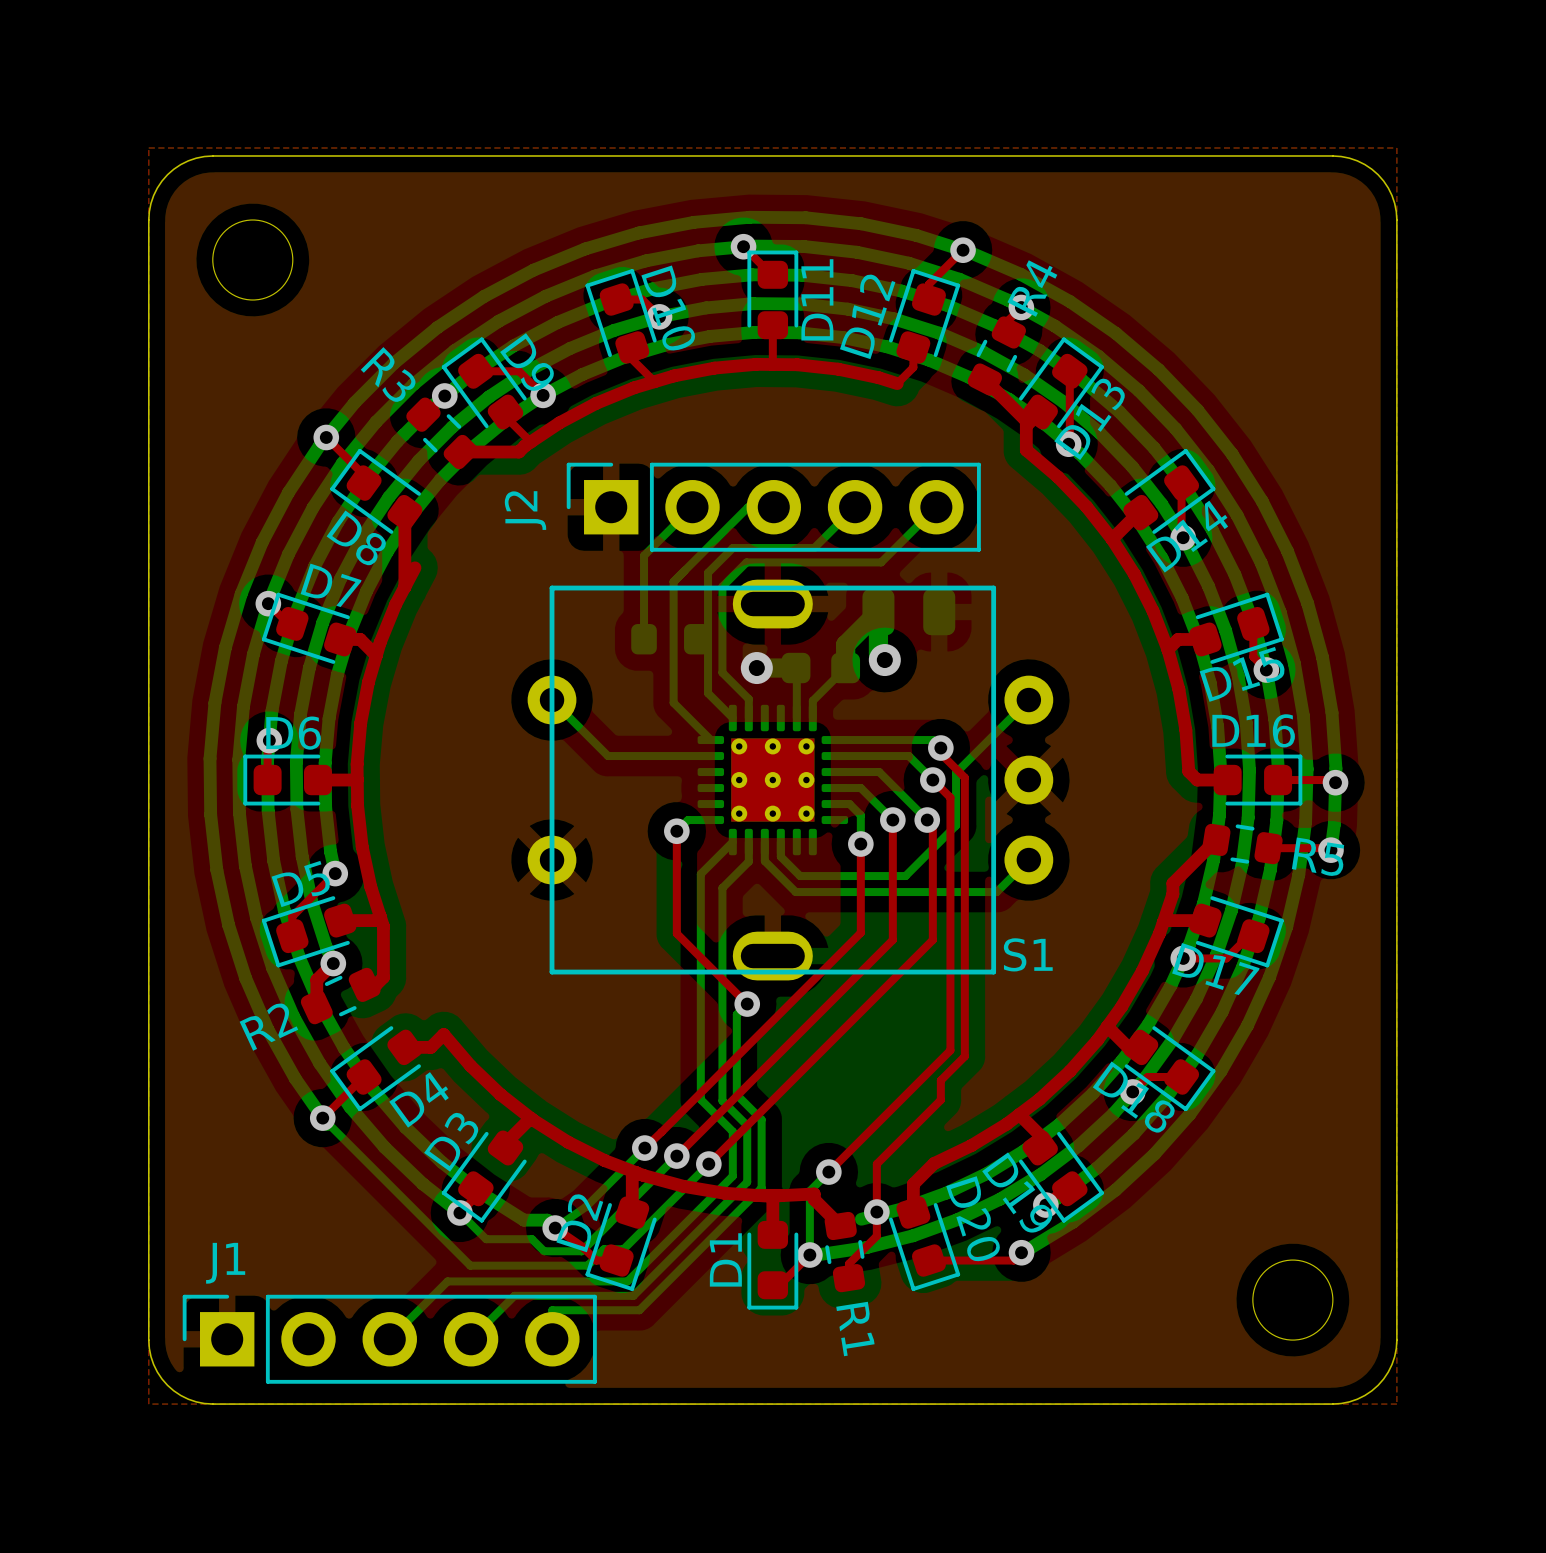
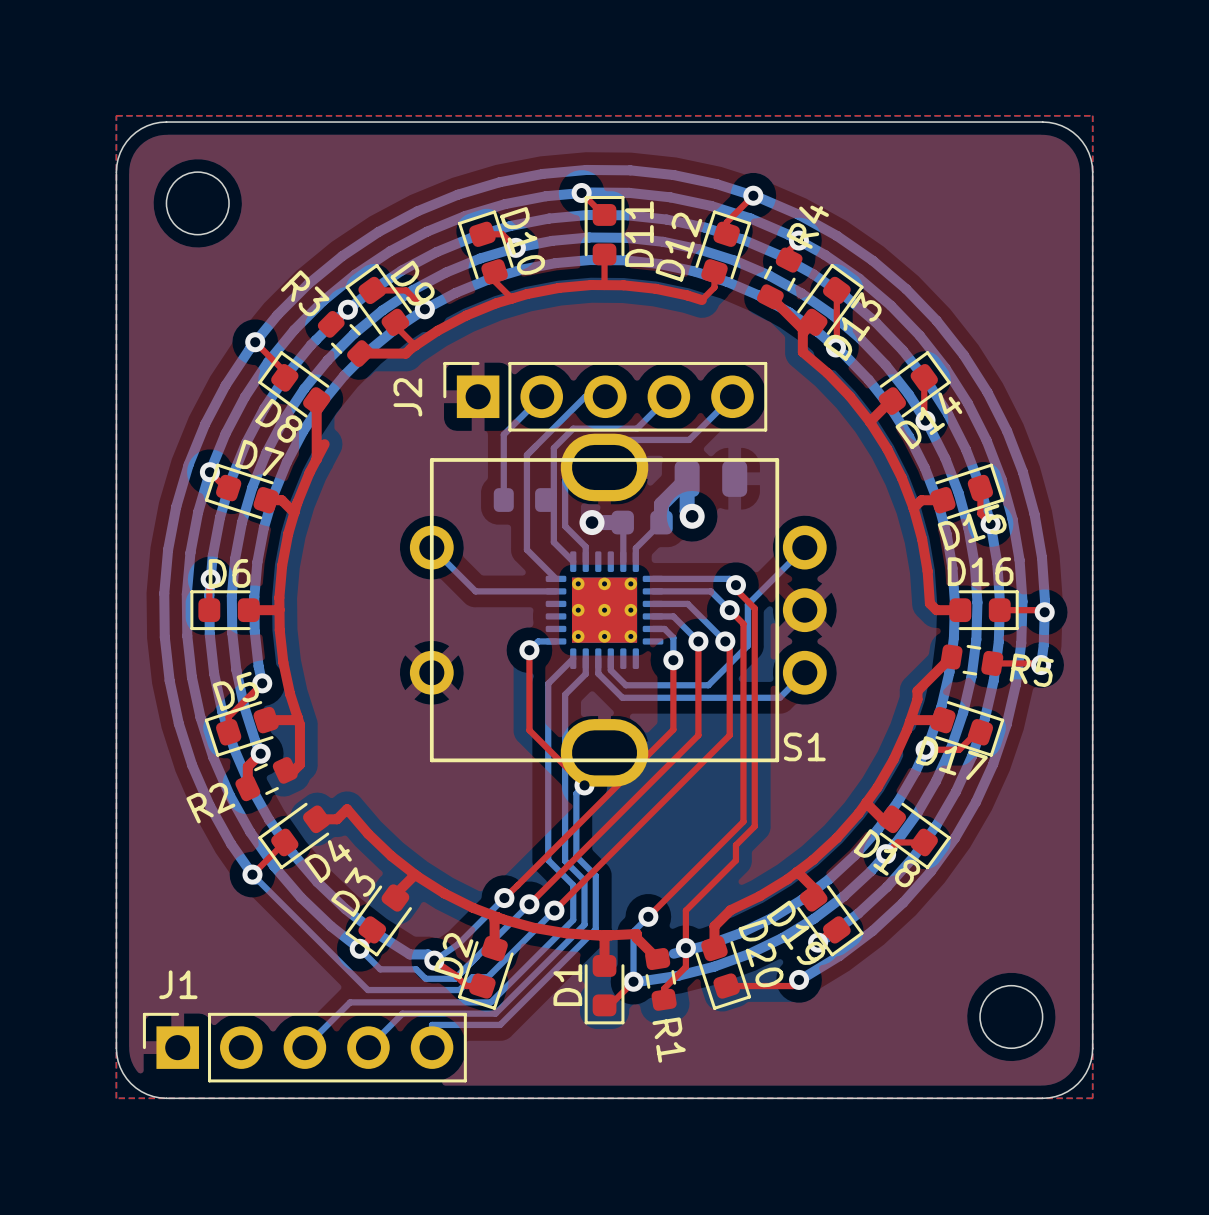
S1 footprint: [527, 579, 1054, 981] -> [409, 433, 827, 787]

